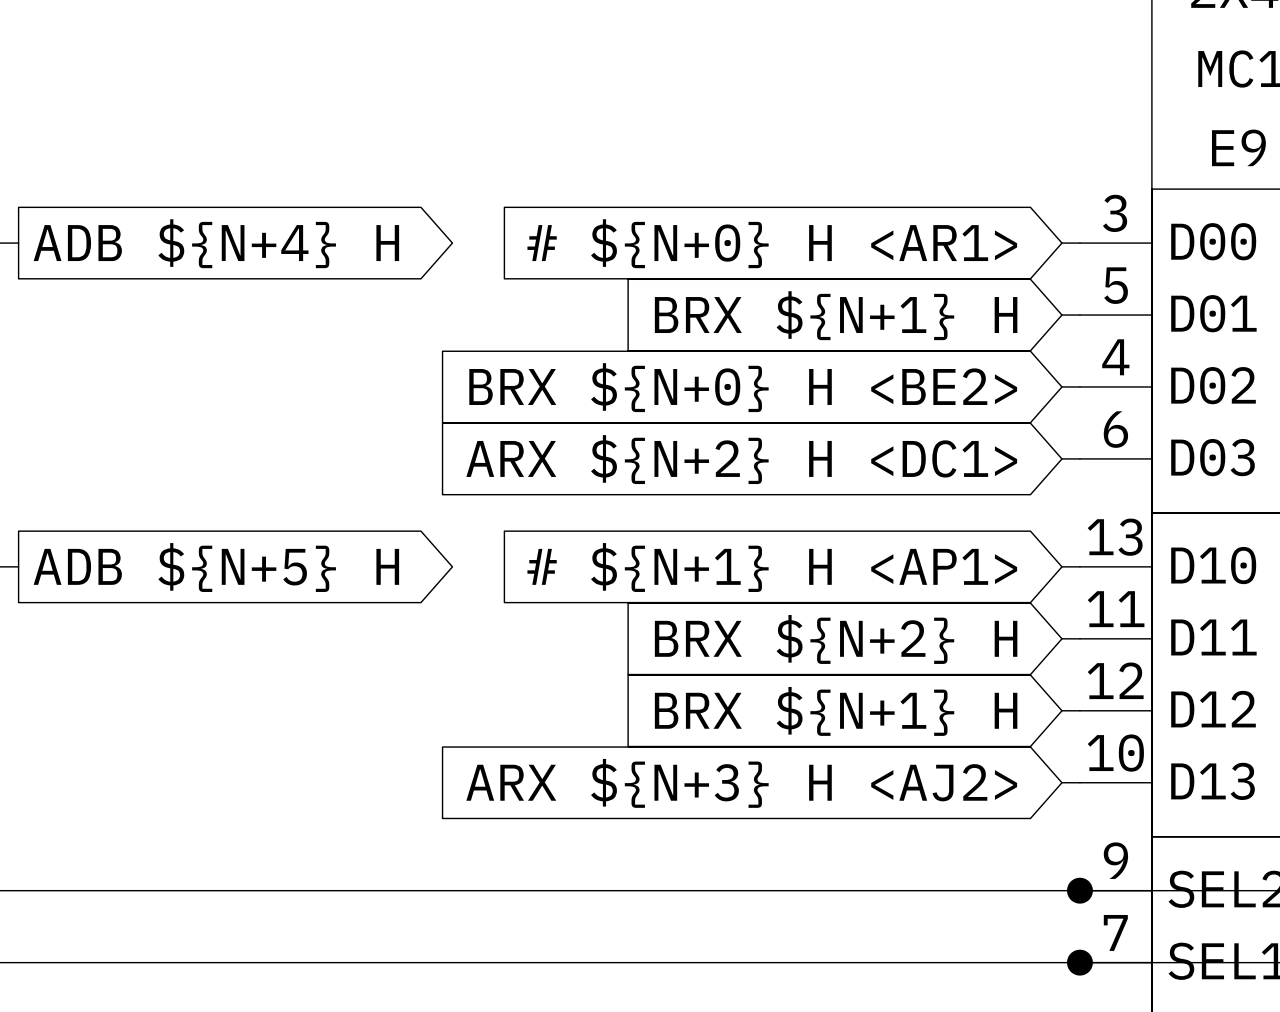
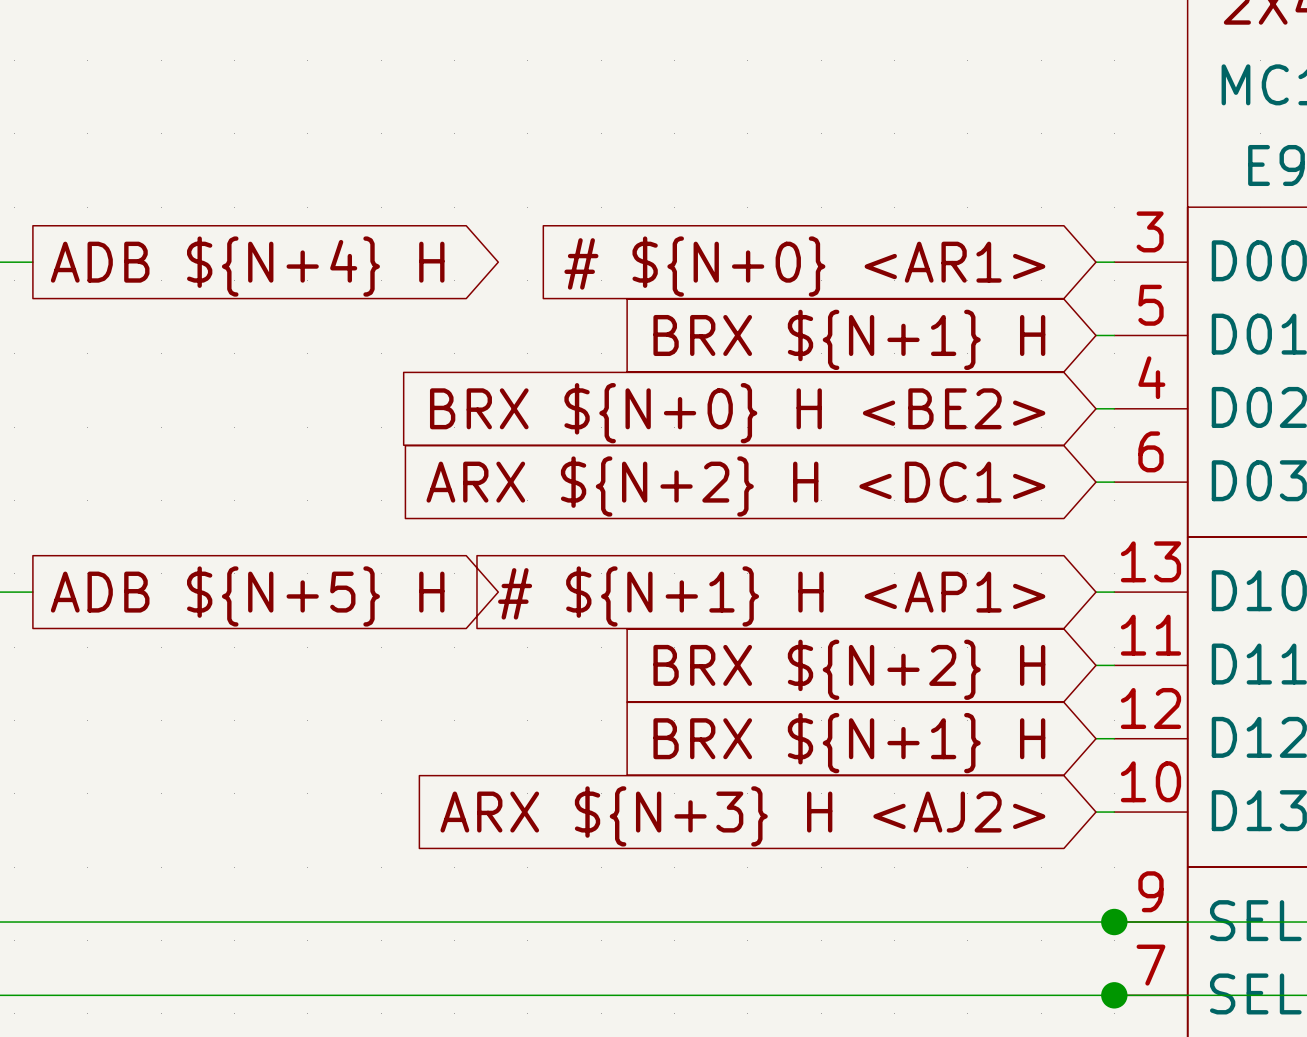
global label: # ${N+0} H <AR1> (772, 243) -> # ${N+0} <AR1> (804, 266)

